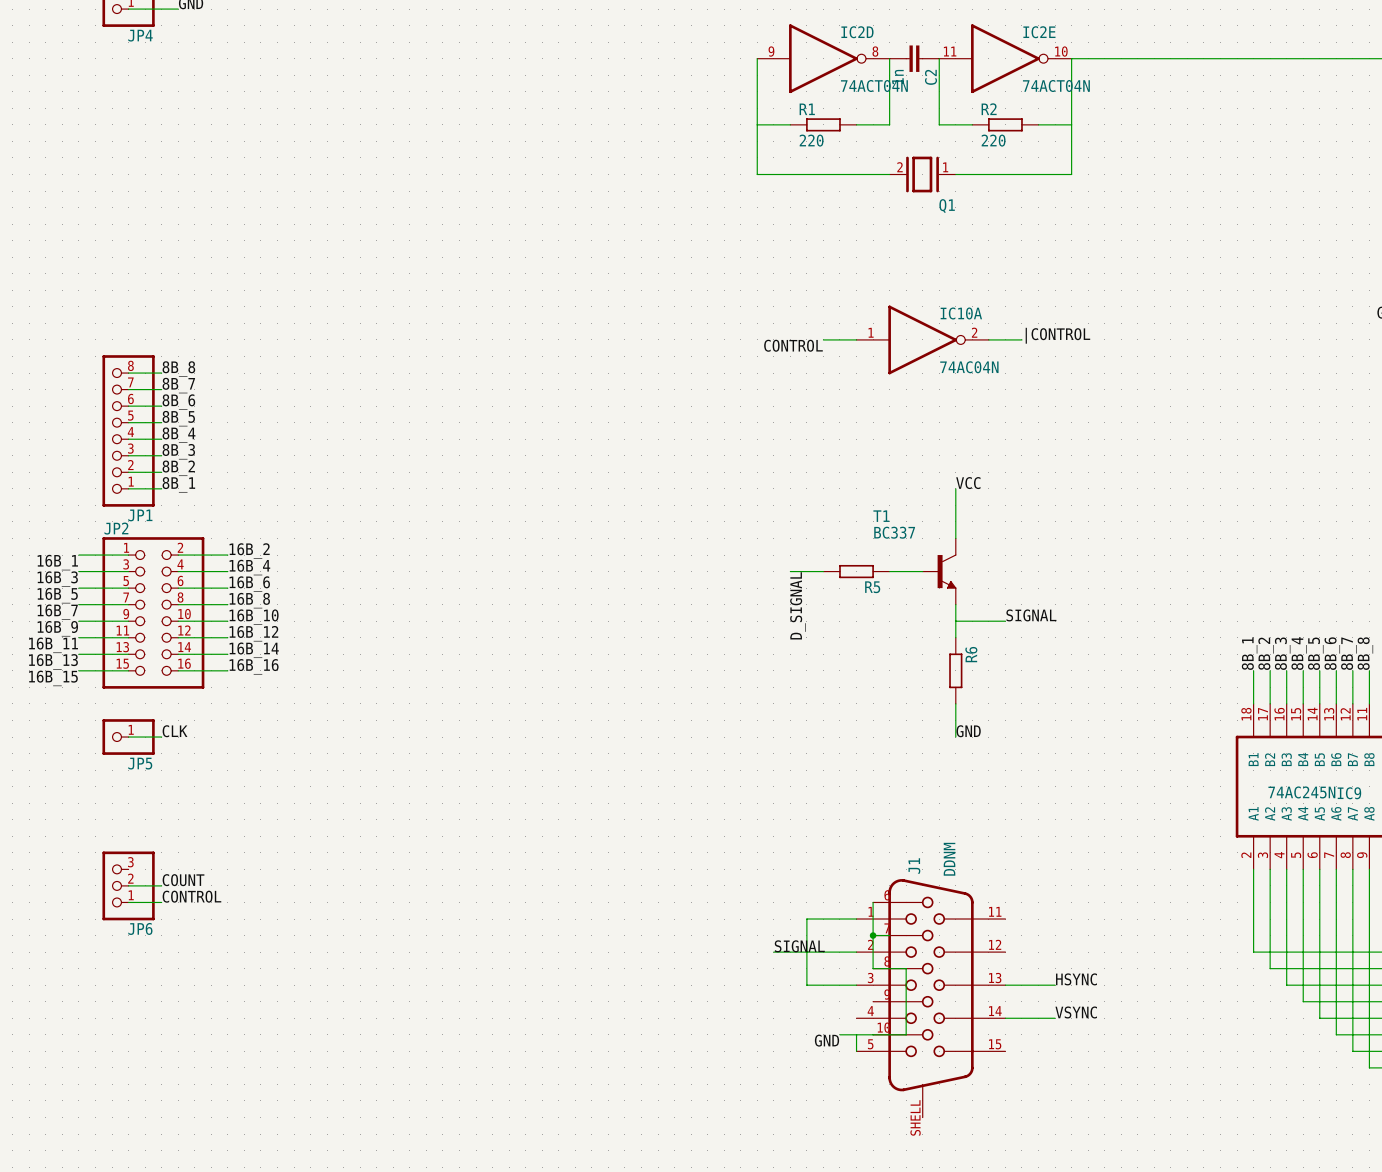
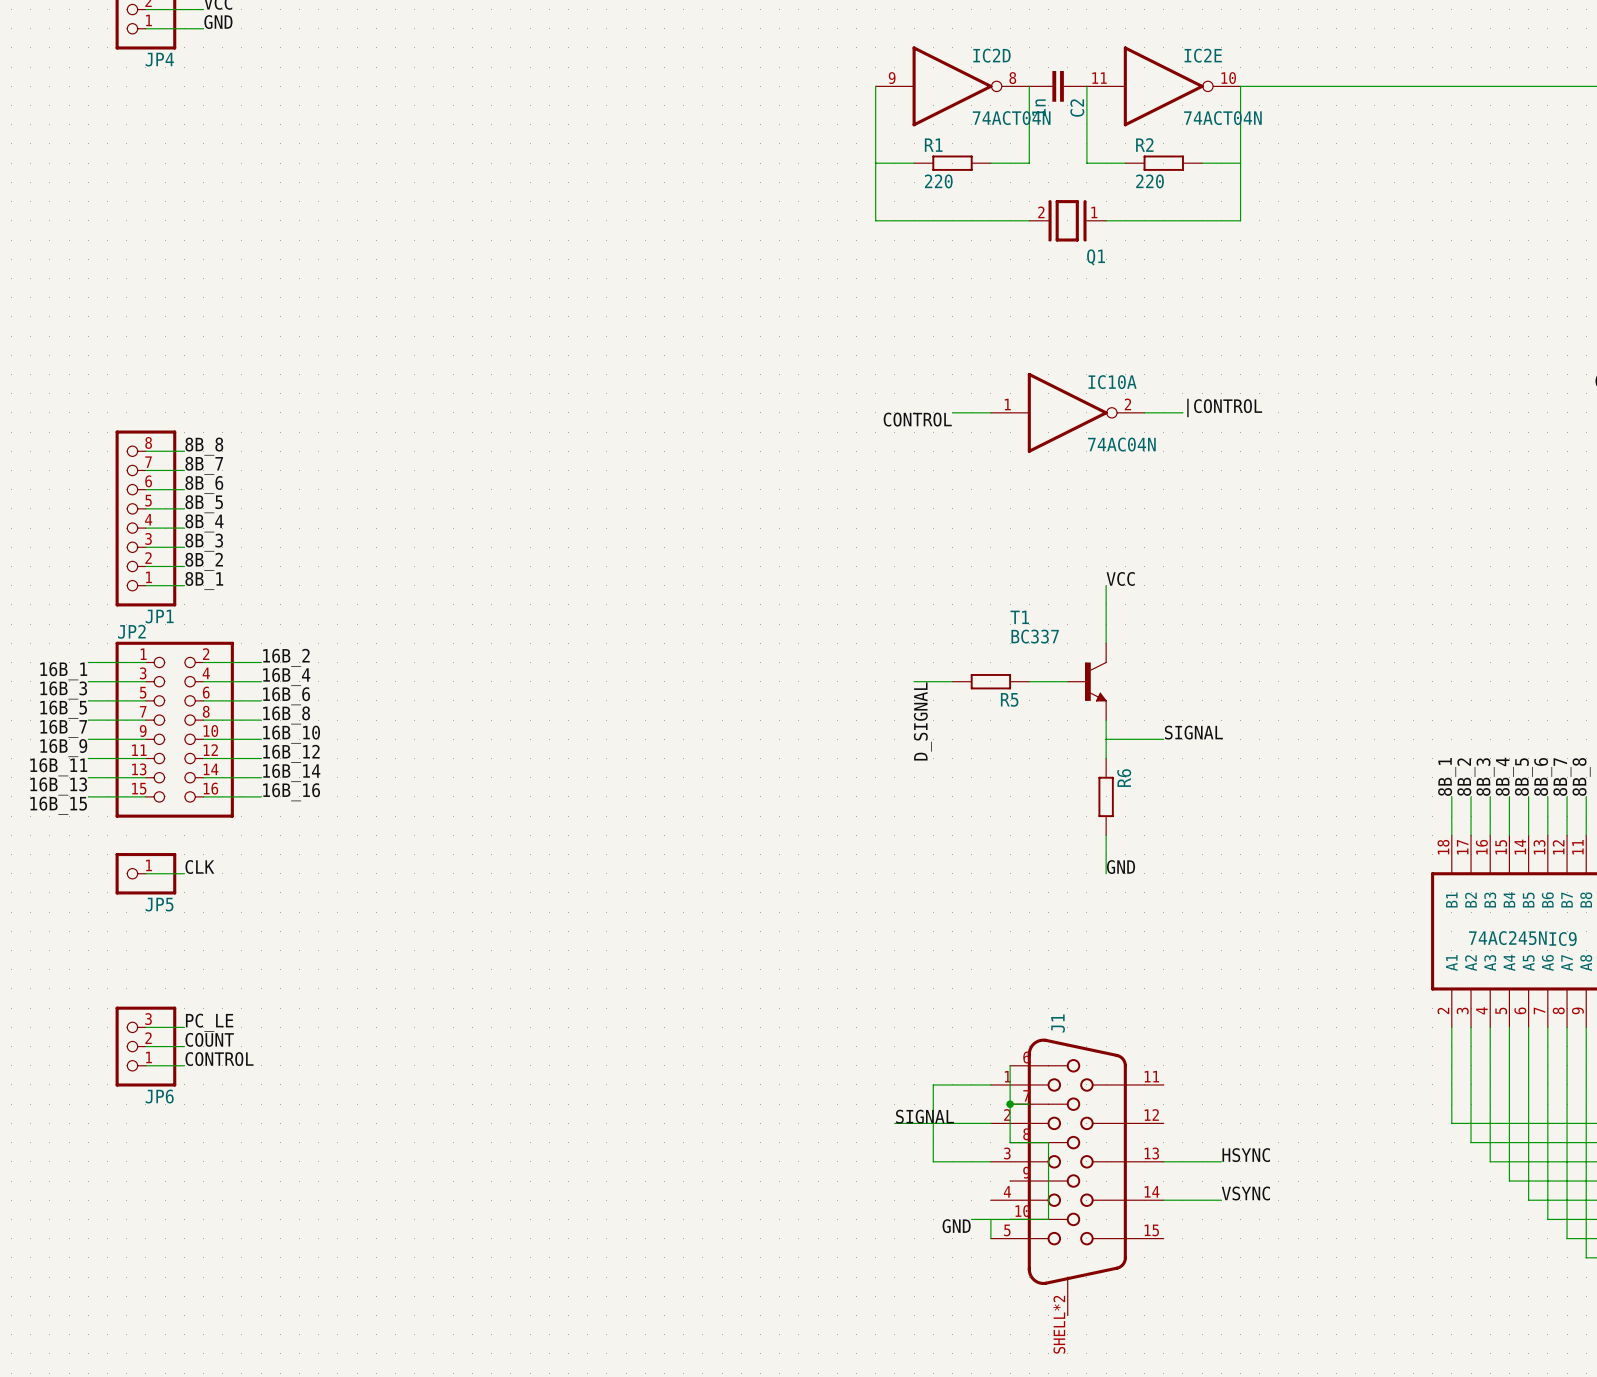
J1 value: DDNM (949, 859) -> none
label: none -> PC_LE (209, 1022)
wire: none -> (145, 1027) (184, 1027)
J1 pin number: SHELL (915, 1117) -> SHELL*2 (1059, 1324)

